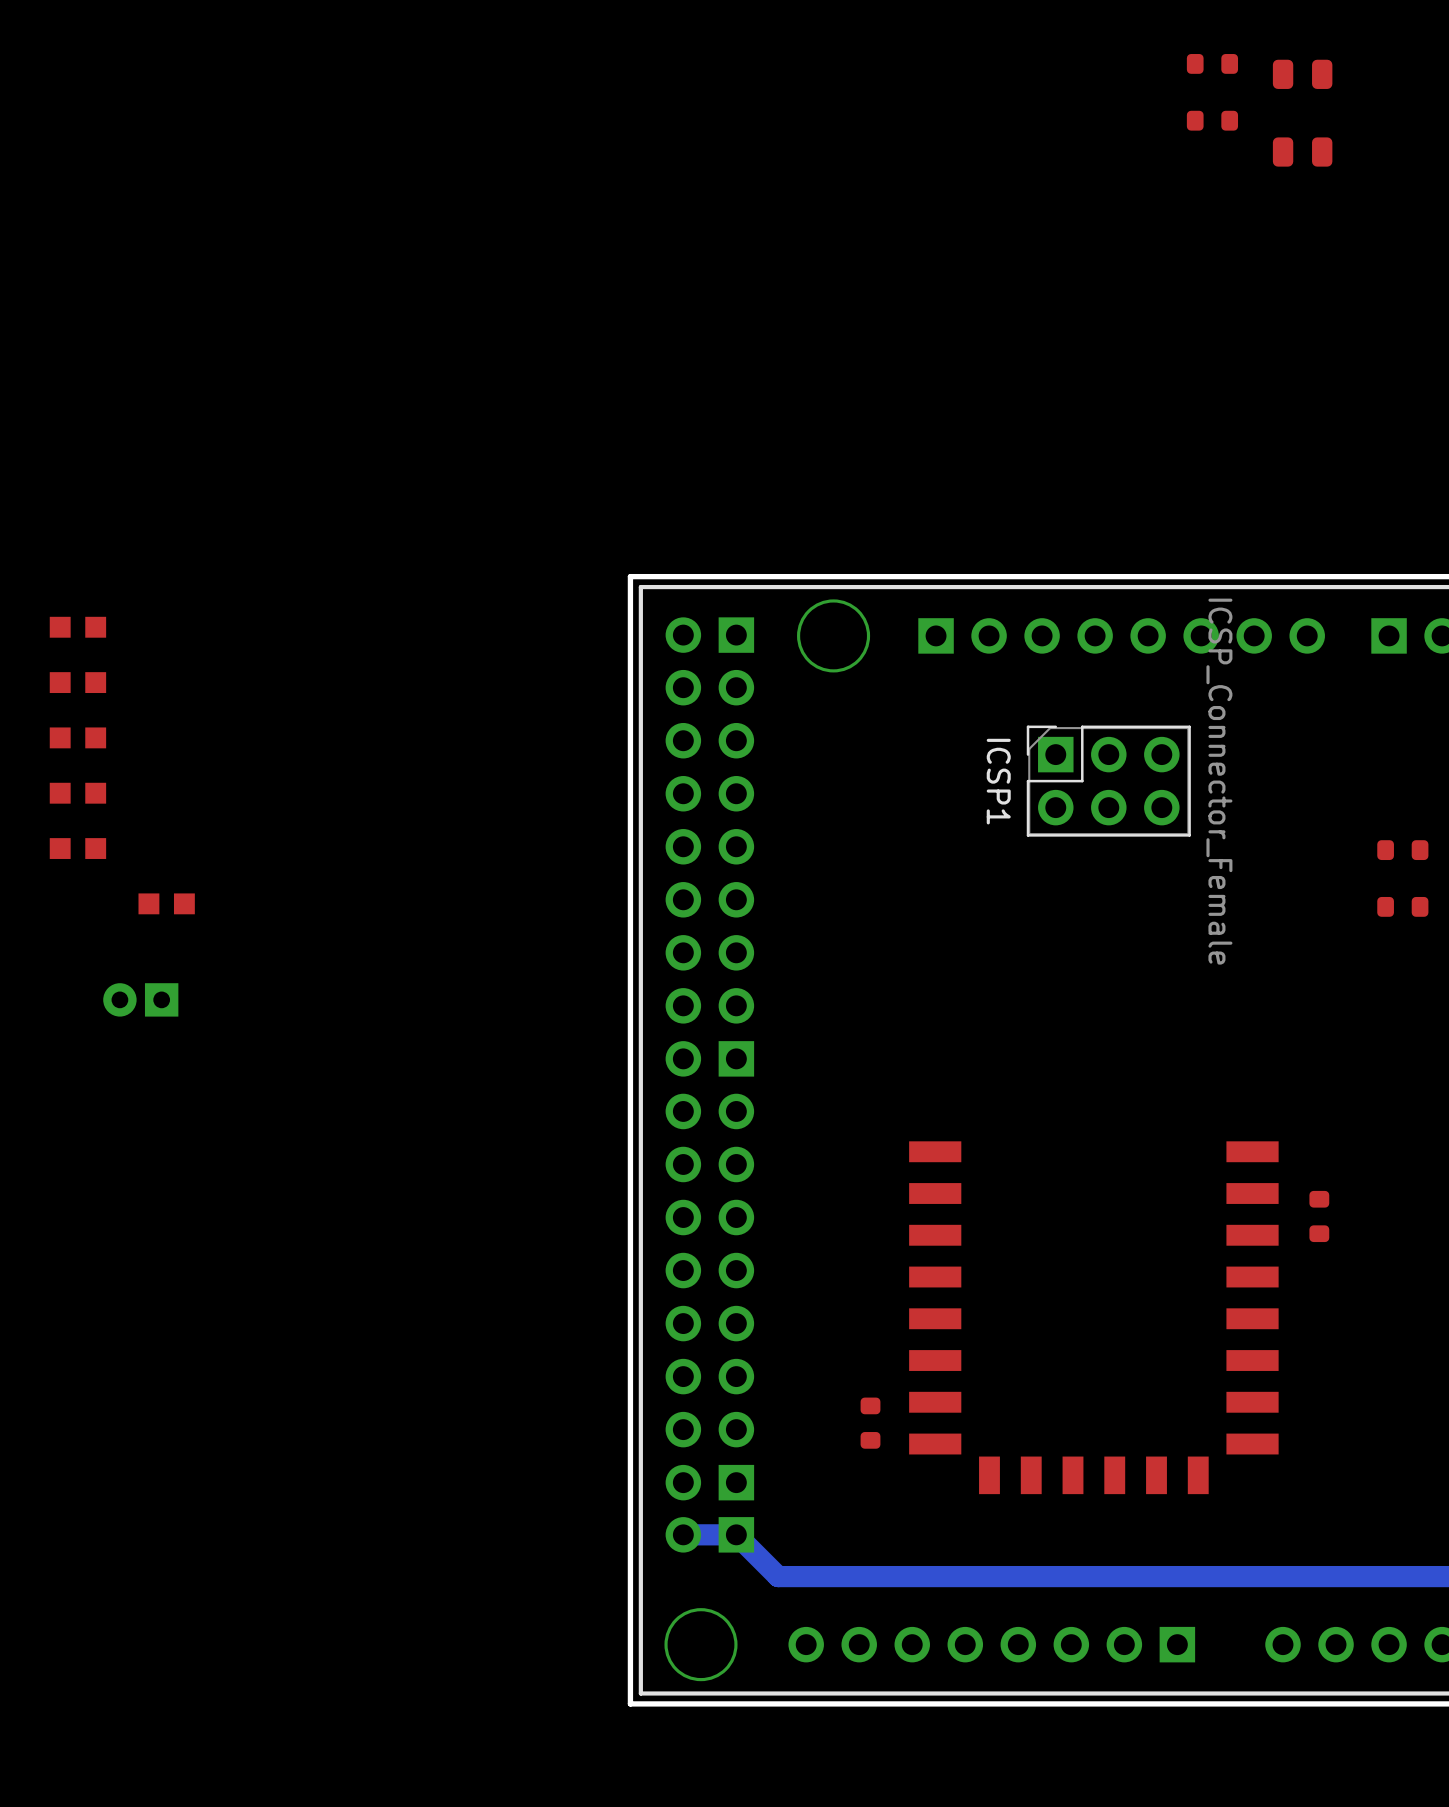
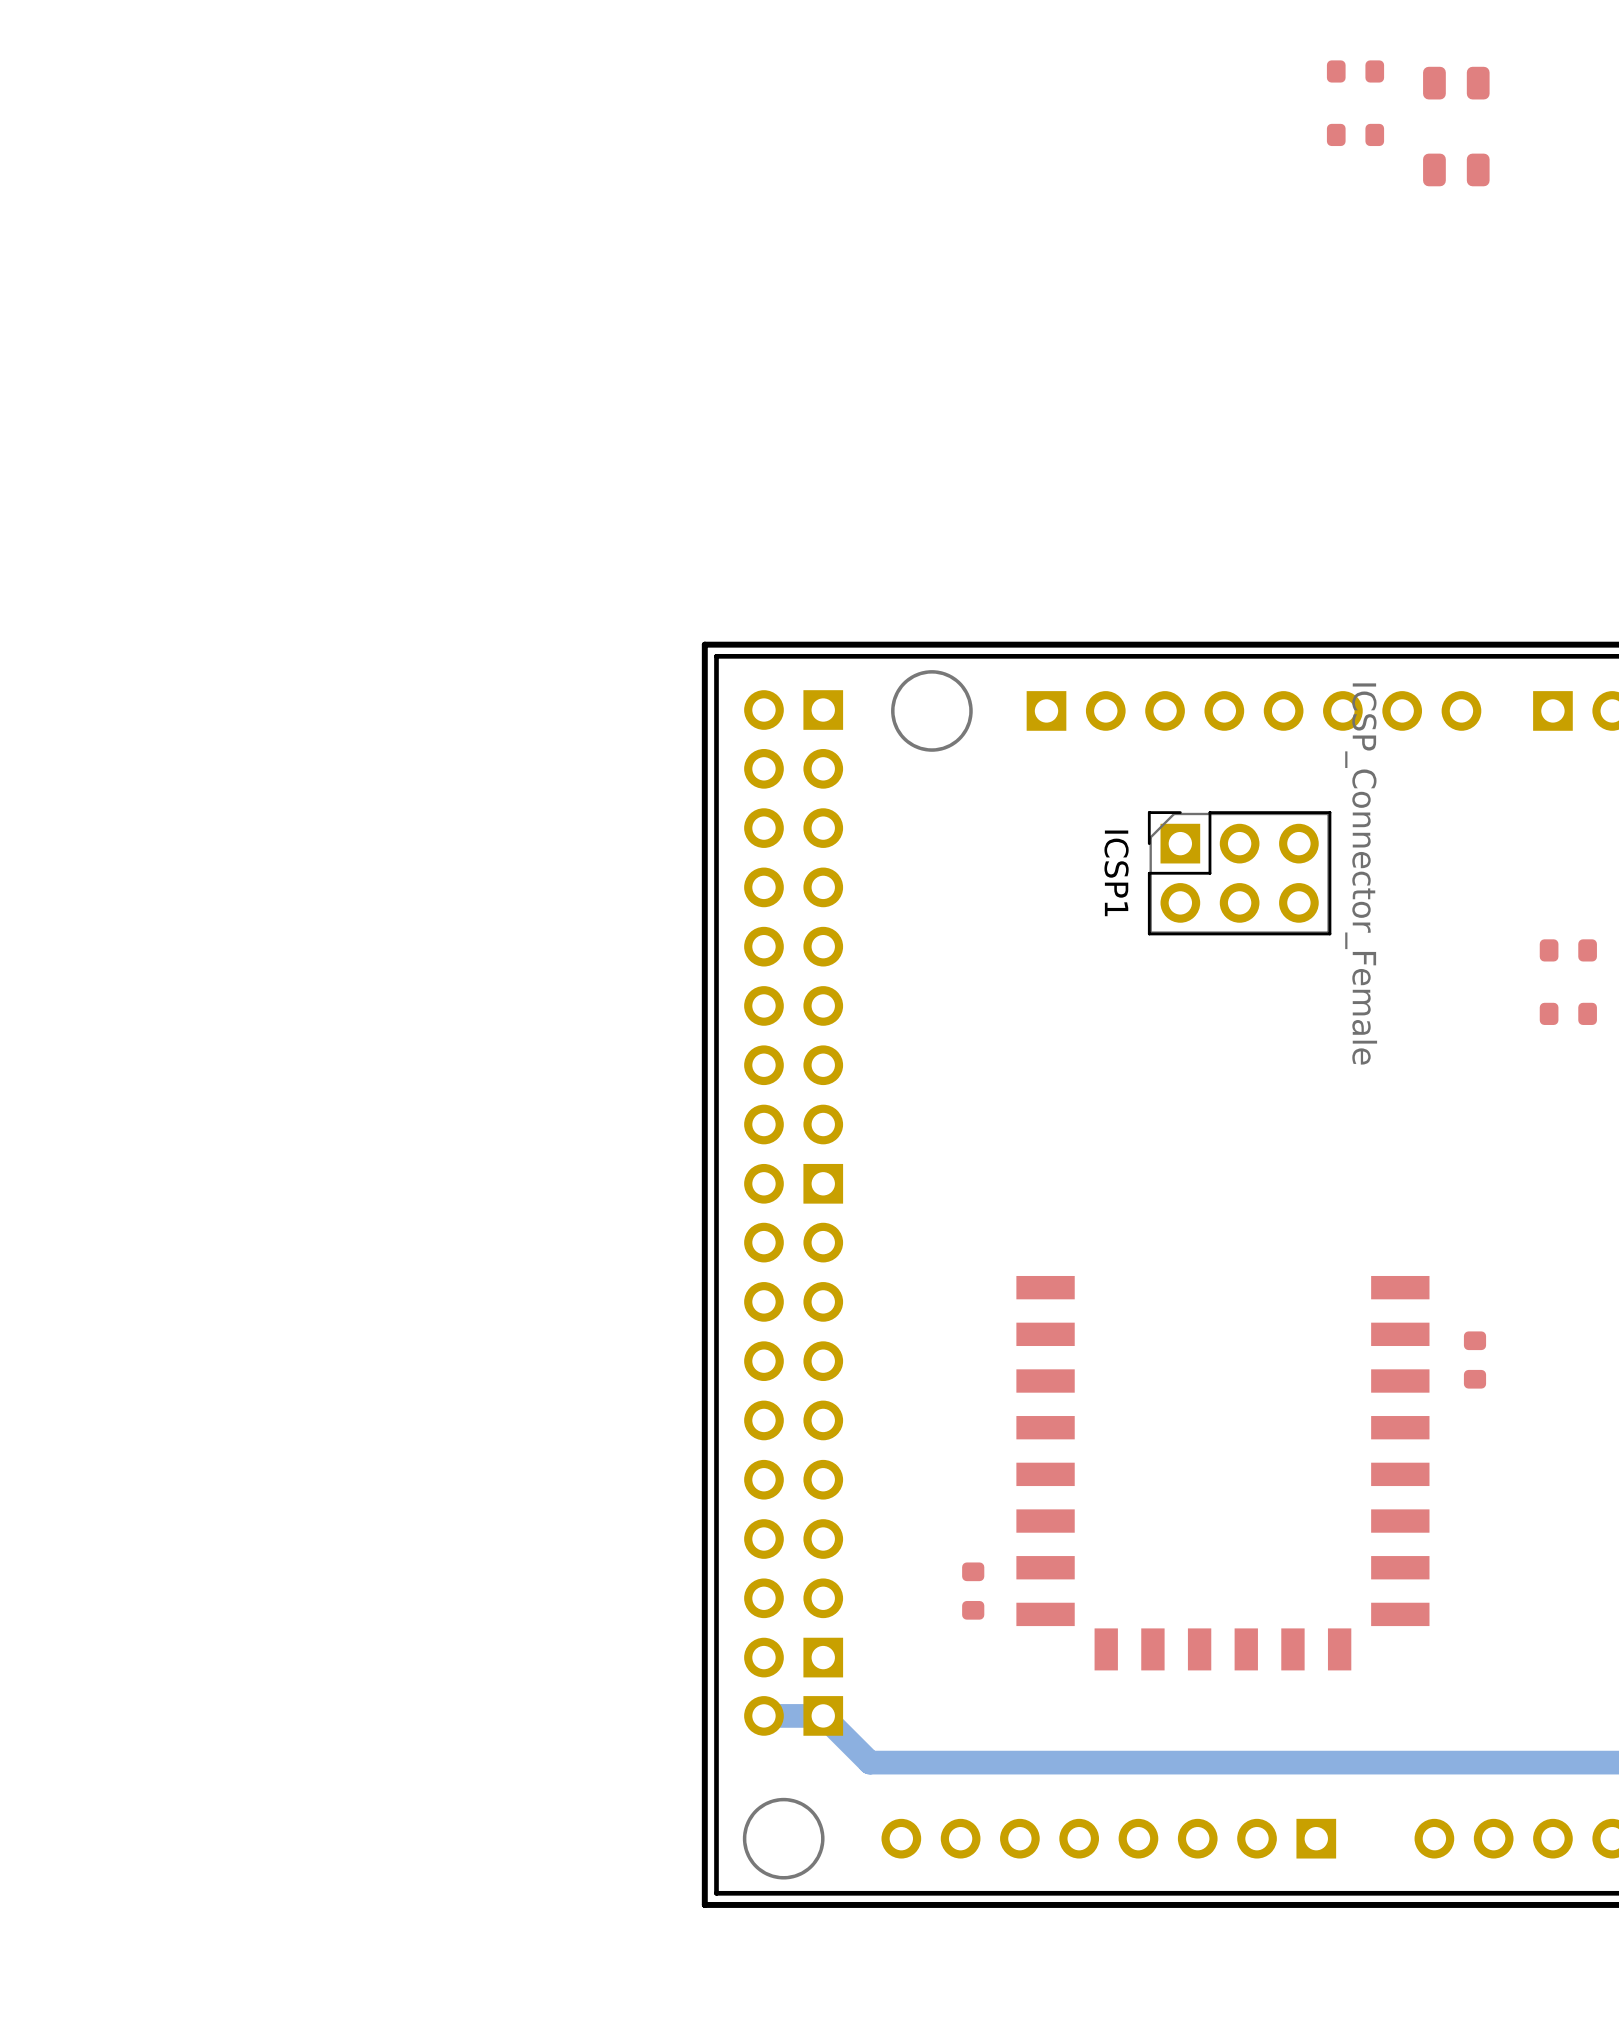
part: (77, 627) -> none
part: (77, 682) -> none
part: (77, 737) -> none
part: (77, 793) -> none
part: (77, 848) -> none
part: (166, 903) -> none
part: (140, 999) -> none

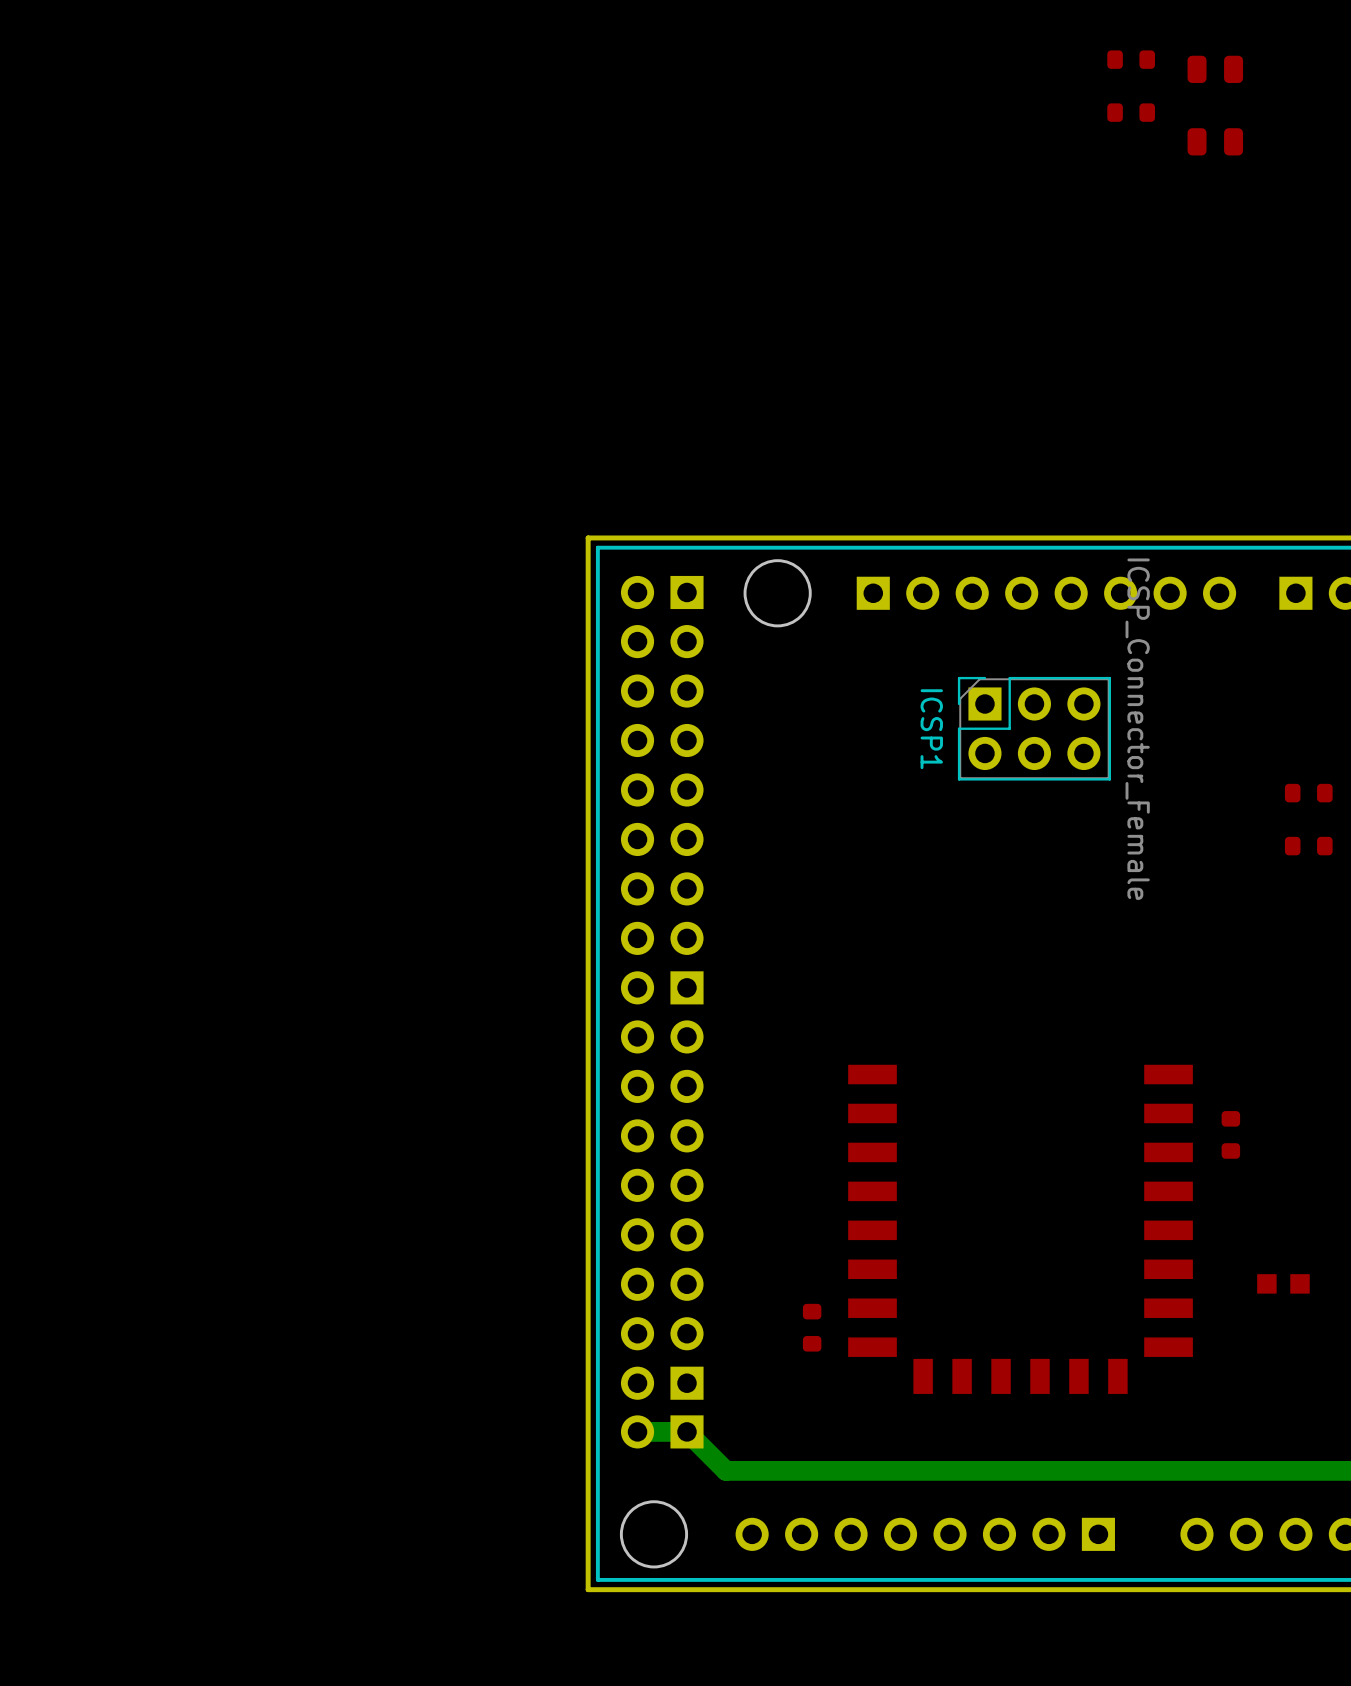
part: none -> (1283, 1283)

